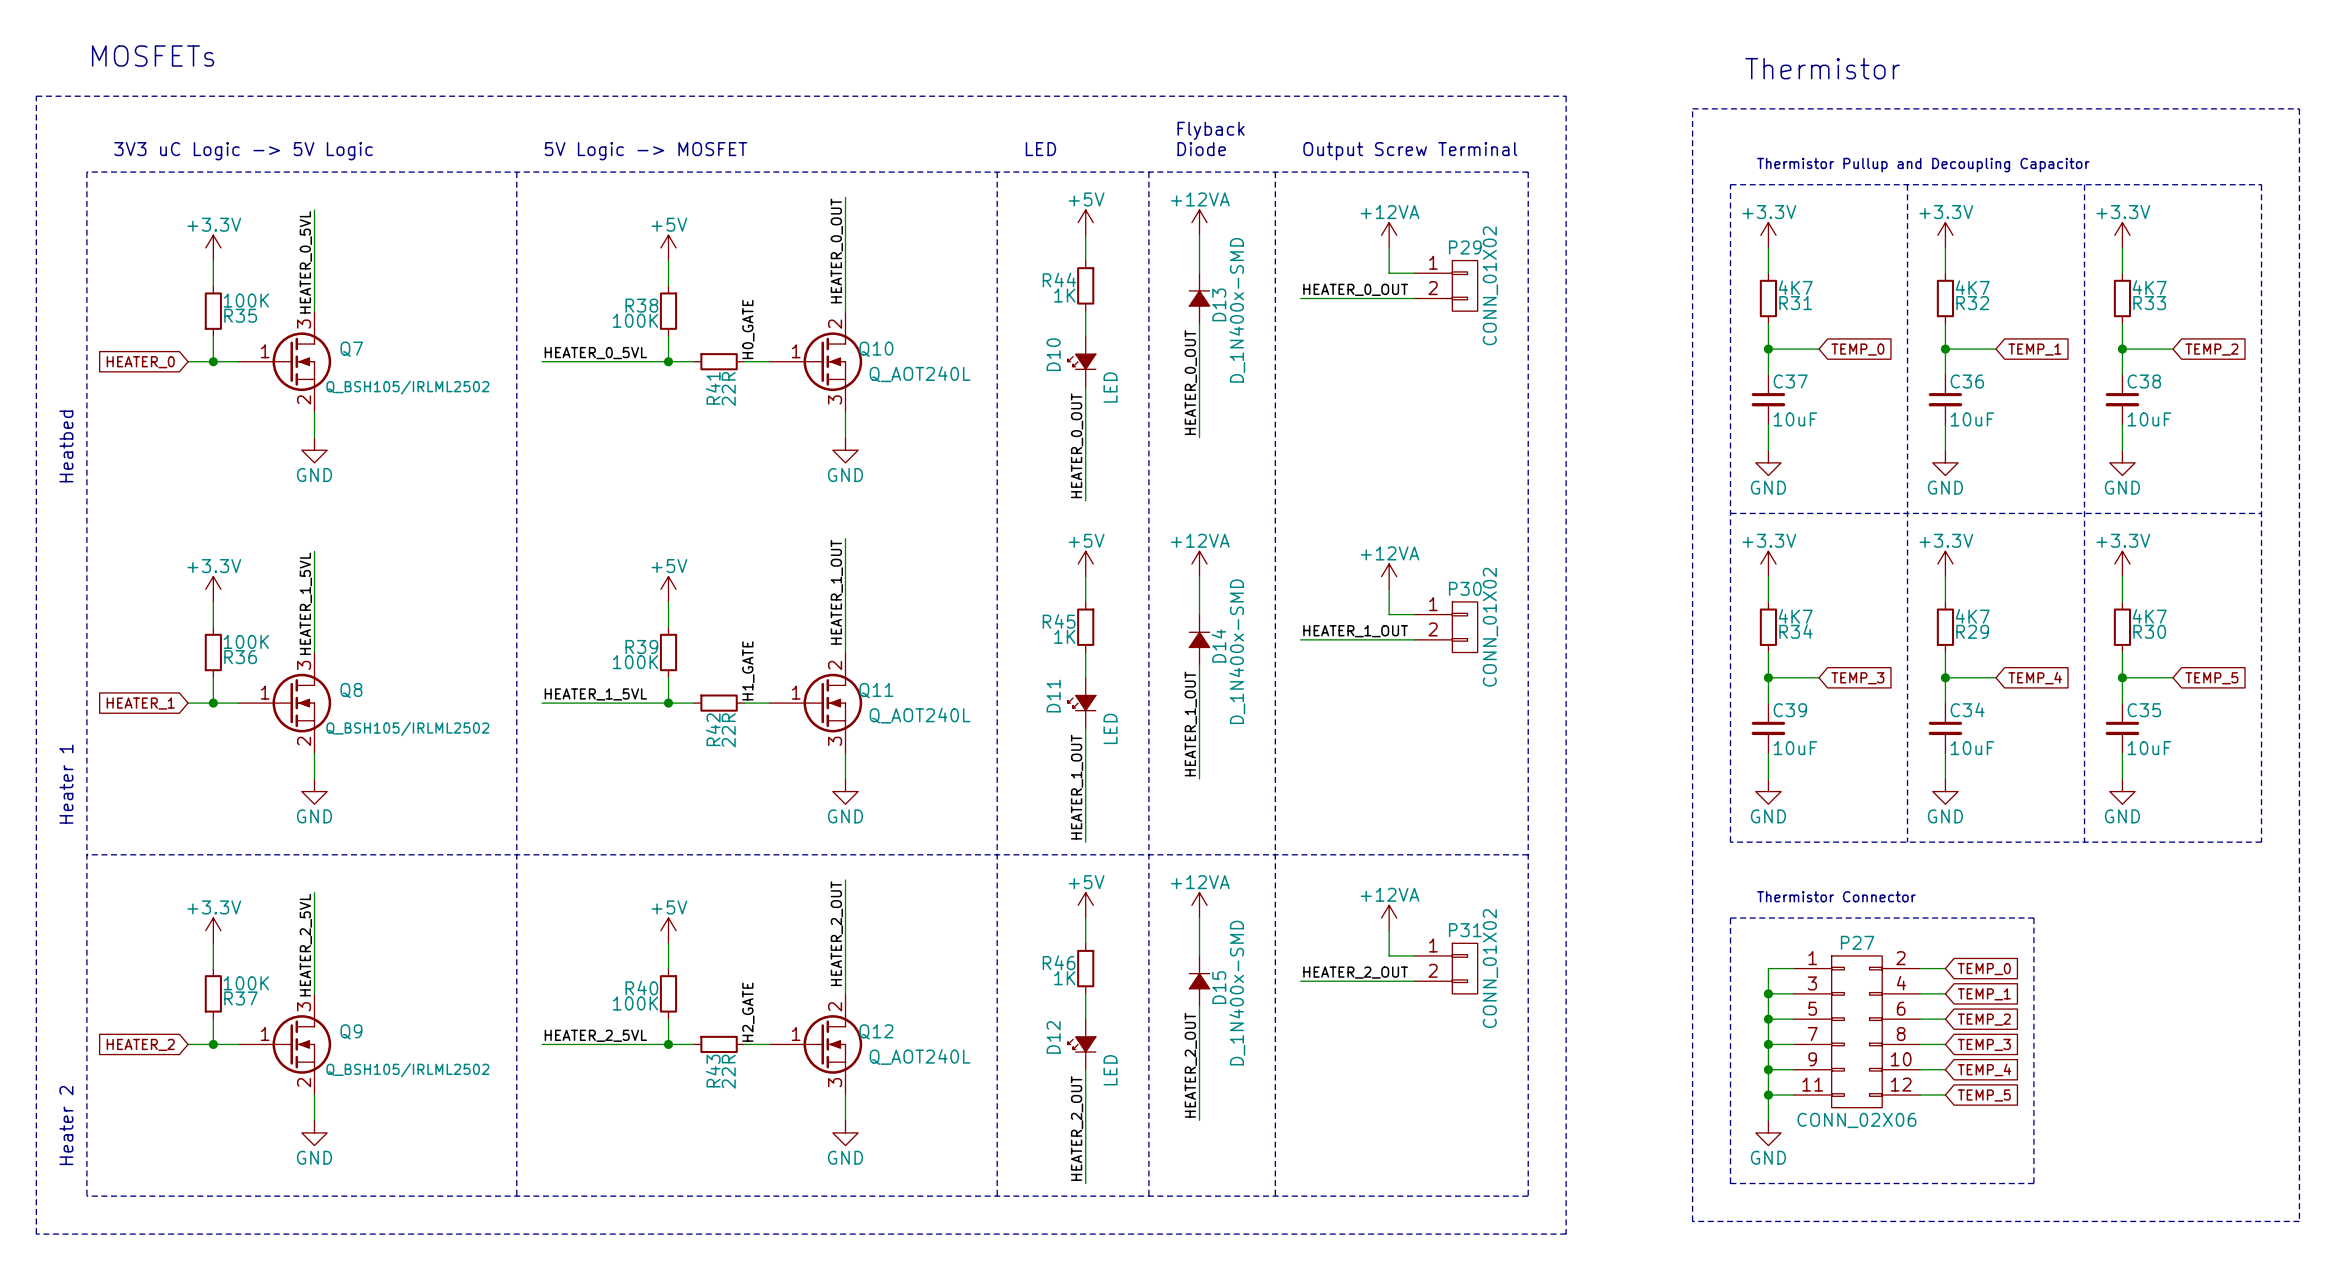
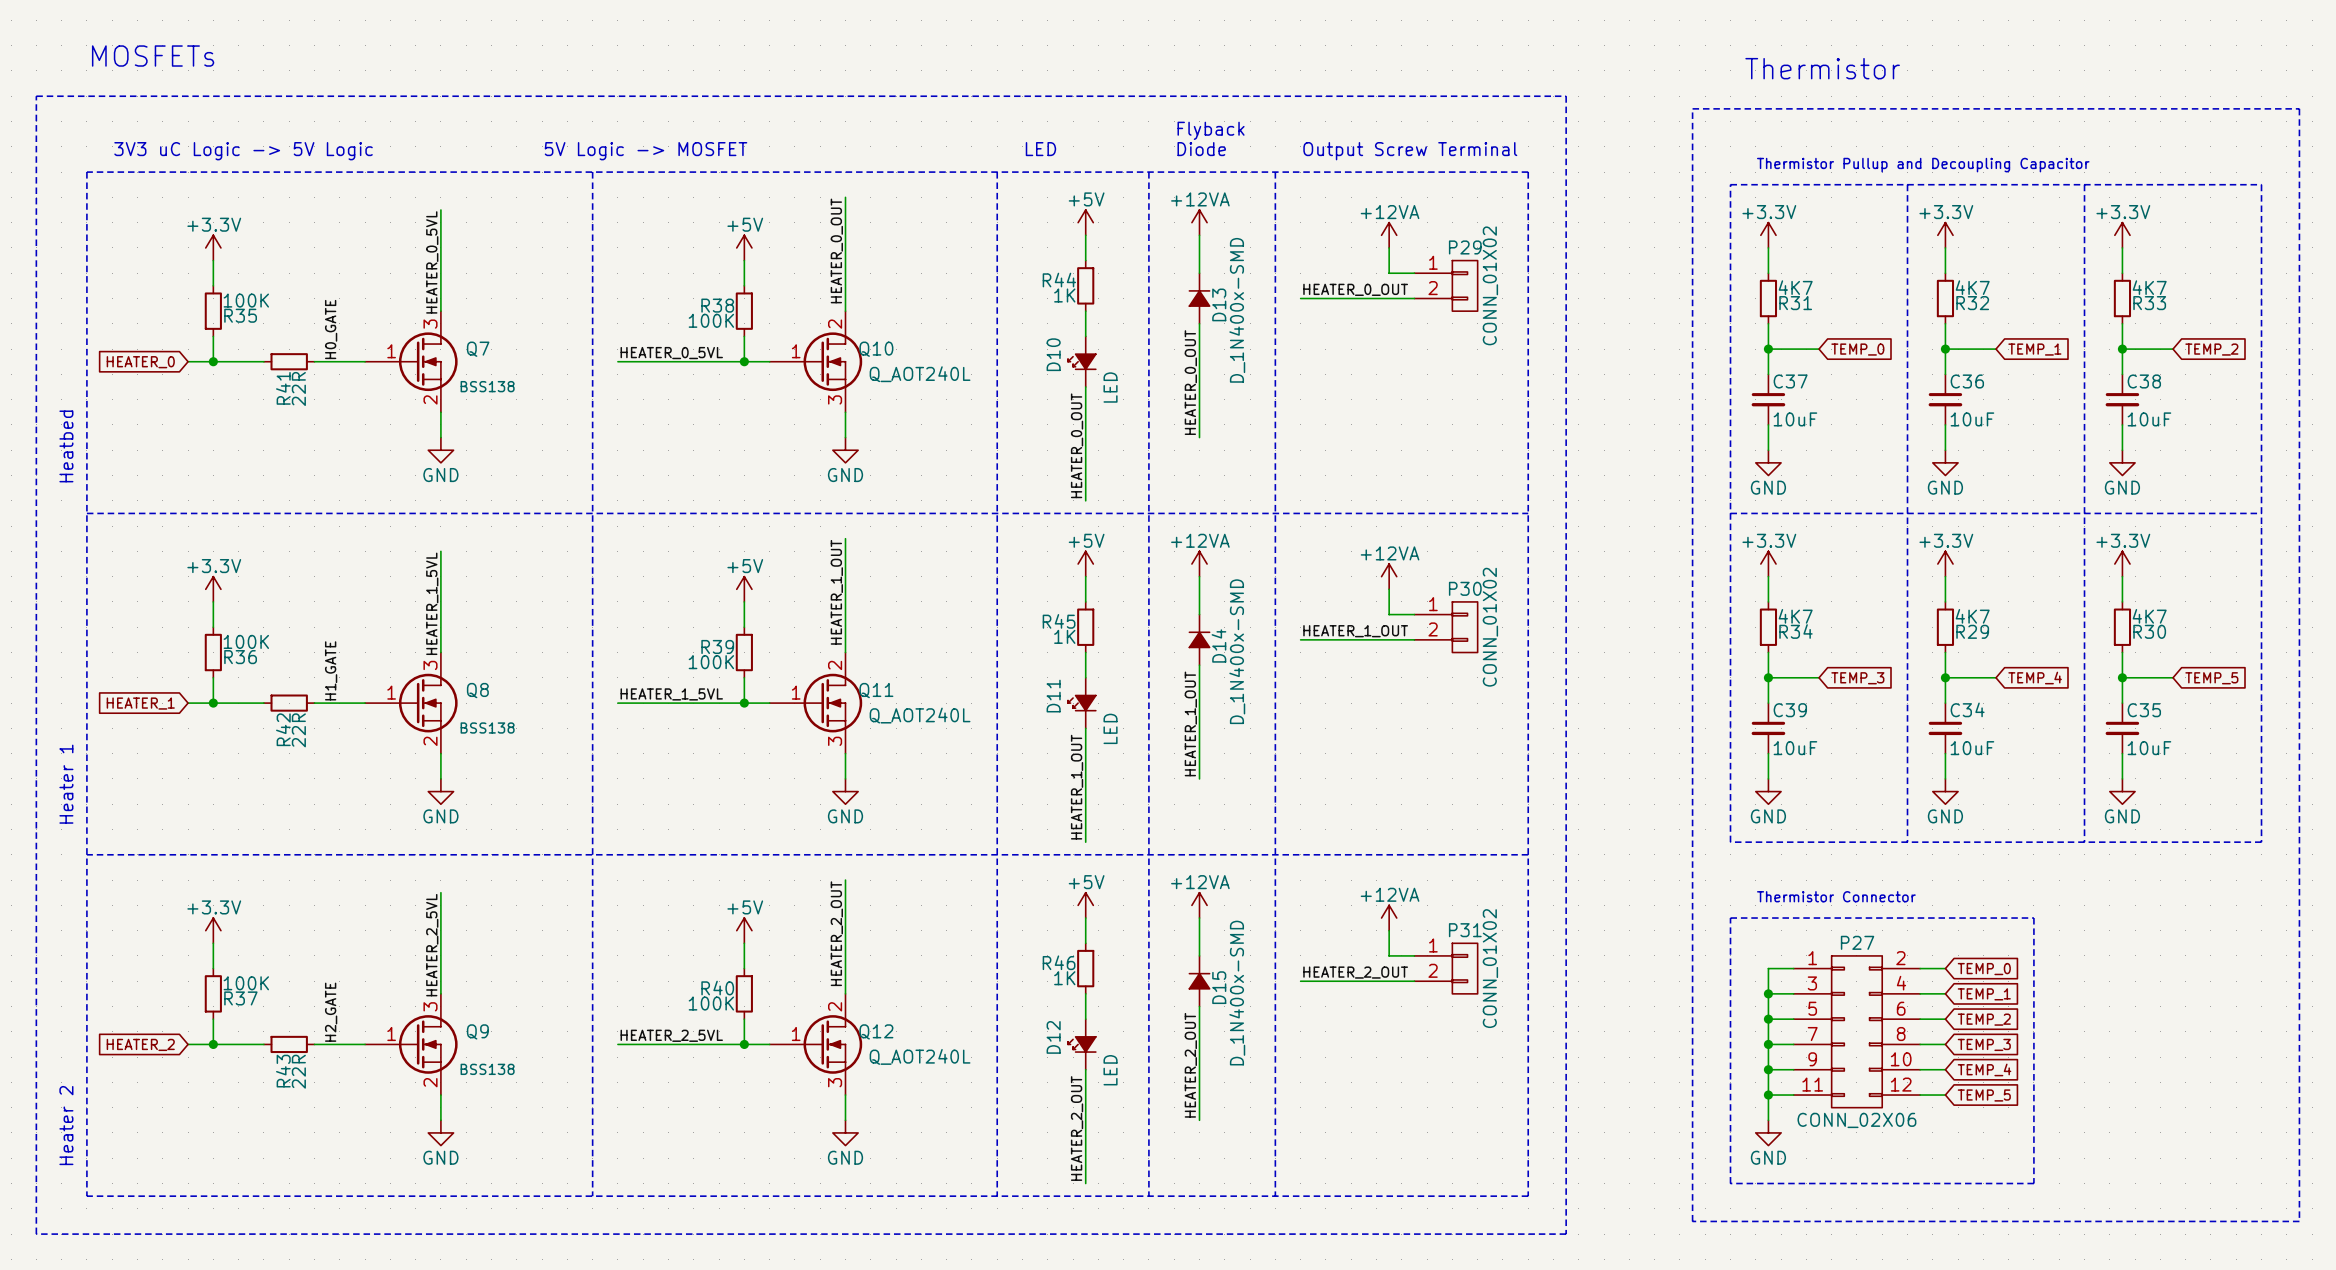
line: (516, 172) (516, 1196) -> (592, 172) (592, 1196)
wire: (314, 210) (314, 311) -> (440, 210) (440, 311)
power symbol position: +5V (668, 247) -> +5V (744, 247)
wire: (668, 260) (668, 285) -> (744, 260) (744, 285)
label: HEATER_0_5VL (305, 262) -> none
label: none -> HEATER_0_5VL (432, 262)
R38 position: (668, 311) -> (744, 311)
label: none -> H0_GATE (331, 329)
label: H0_GATE (748, 329) -> none
wire: (668, 336) (668, 361) -> none
wire: none -> (744, 336) (744, 361) (693, 361)
label position: HEATER_0_5VL (595, 353) -> HEATER_0_5VL (671, 353)
Q7 position: (284, 361) -> (411, 361)
wire: none -> (314, 361) (365, 361)
wire: (542, 361) (617, 361) -> none
junction: (668, 361) -> none
R41 position: (719, 361) -> (289, 361)
junction: none -> (744, 361)
Q7 value: Q_BSH105/IRLML2502 (407, 387) -> BSS138 (487, 386)
wire: (314, 412) (314, 437) -> (440, 412) (440, 437)
power symbol position: GND (314, 450) -> GND (440, 450)
line: none -> (86, 513) (1528, 513)
wire: (314, 551) (314, 652) -> (440, 551) (440, 652)
power symbol position: +5V (668, 589) -> +5V (744, 589)
wire: (668, 601) (668, 627) -> (744, 601) (744, 627)
label: HEATER_1_5VL (305, 603) -> none
label: none -> HEATER_1_5VL (432, 603)
R39 position: (668, 652) -> (744, 652)
label: none -> H1_GATE (331, 670)
label: H1_GATE (748, 670) -> none
wire: (668, 677) (668, 703) -> none
wire: none -> (744, 677) (744, 703) (693, 703)
label position: HEATER_1_5VL (595, 694) -> HEATER_1_5VL (671, 694)
Q8 position: (284, 703) -> (411, 703)
wire: none -> (314, 703) (365, 703)
wire: (542, 703) (617, 703) -> none
junction: (668, 703) -> none
R42 position: (719, 703) -> (289, 703)
junction: none -> (744, 703)
Q8 value: Q_BSH105/IRLML2502 (407, 728) -> BSS138 (487, 728)
wire: (314, 753) (314, 778) -> (440, 753) (440, 778)
power symbol position: GND (314, 791) -> GND (440, 791)
wire: (314, 892) (314, 993) -> (440, 892) (440, 993)
power symbol position: +5V (668, 930) -> +5V (744, 930)
wire: (668, 943) (668, 968) -> (744, 943) (744, 968)
label: HEATER_2_5VL (305, 945) -> none
label: none -> HEATER_2_5VL (432, 945)
R40 position: (668, 993) -> (744, 993)
label: none -> H2_GATE (331, 1012)
label: H2_GATE (748, 1012) -> none
wire: (668, 1019) (668, 1044) -> none
wire: none -> (744, 1019) (744, 1044) (693, 1044)
label position: HEATER_2_5VL (595, 1035) -> HEATER_2_5VL (671, 1035)
Q9 position: (284, 1044) -> (411, 1044)
wire: none -> (314, 1044) (365, 1044)
wire: (542, 1044) (617, 1044) -> none
junction: (668, 1044) -> none
R43 position: (719, 1044) -> (289, 1044)
junction: none -> (744, 1044)
Q9 value: Q_BSH105/IRLML2502 (407, 1070) -> BSS138 (487, 1069)
wire: (314, 1095) (314, 1120) -> (440, 1095) (440, 1120)
power symbol position: GND (314, 1132) -> GND (440, 1132)

